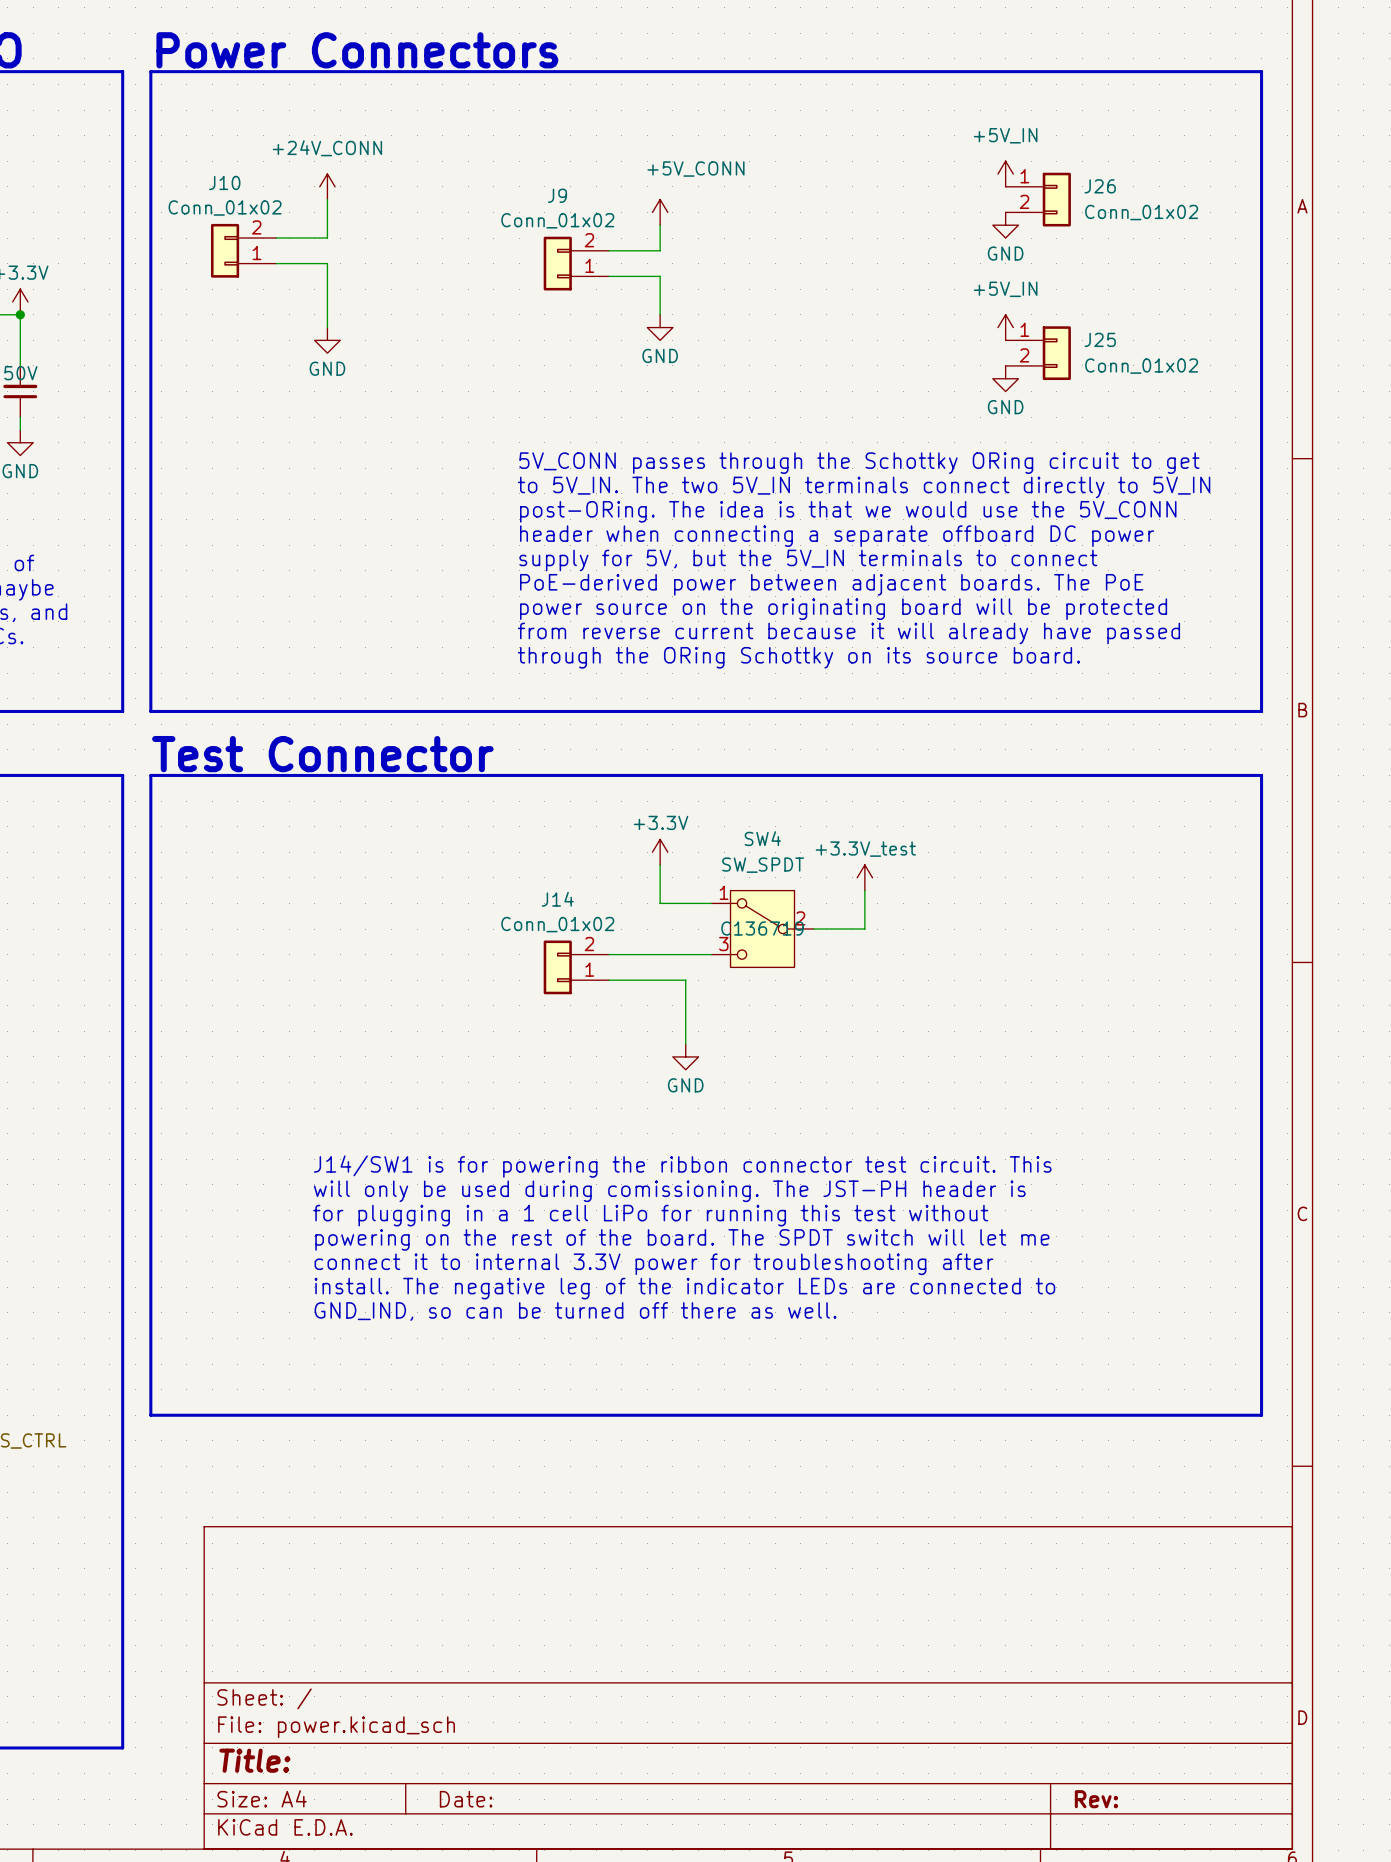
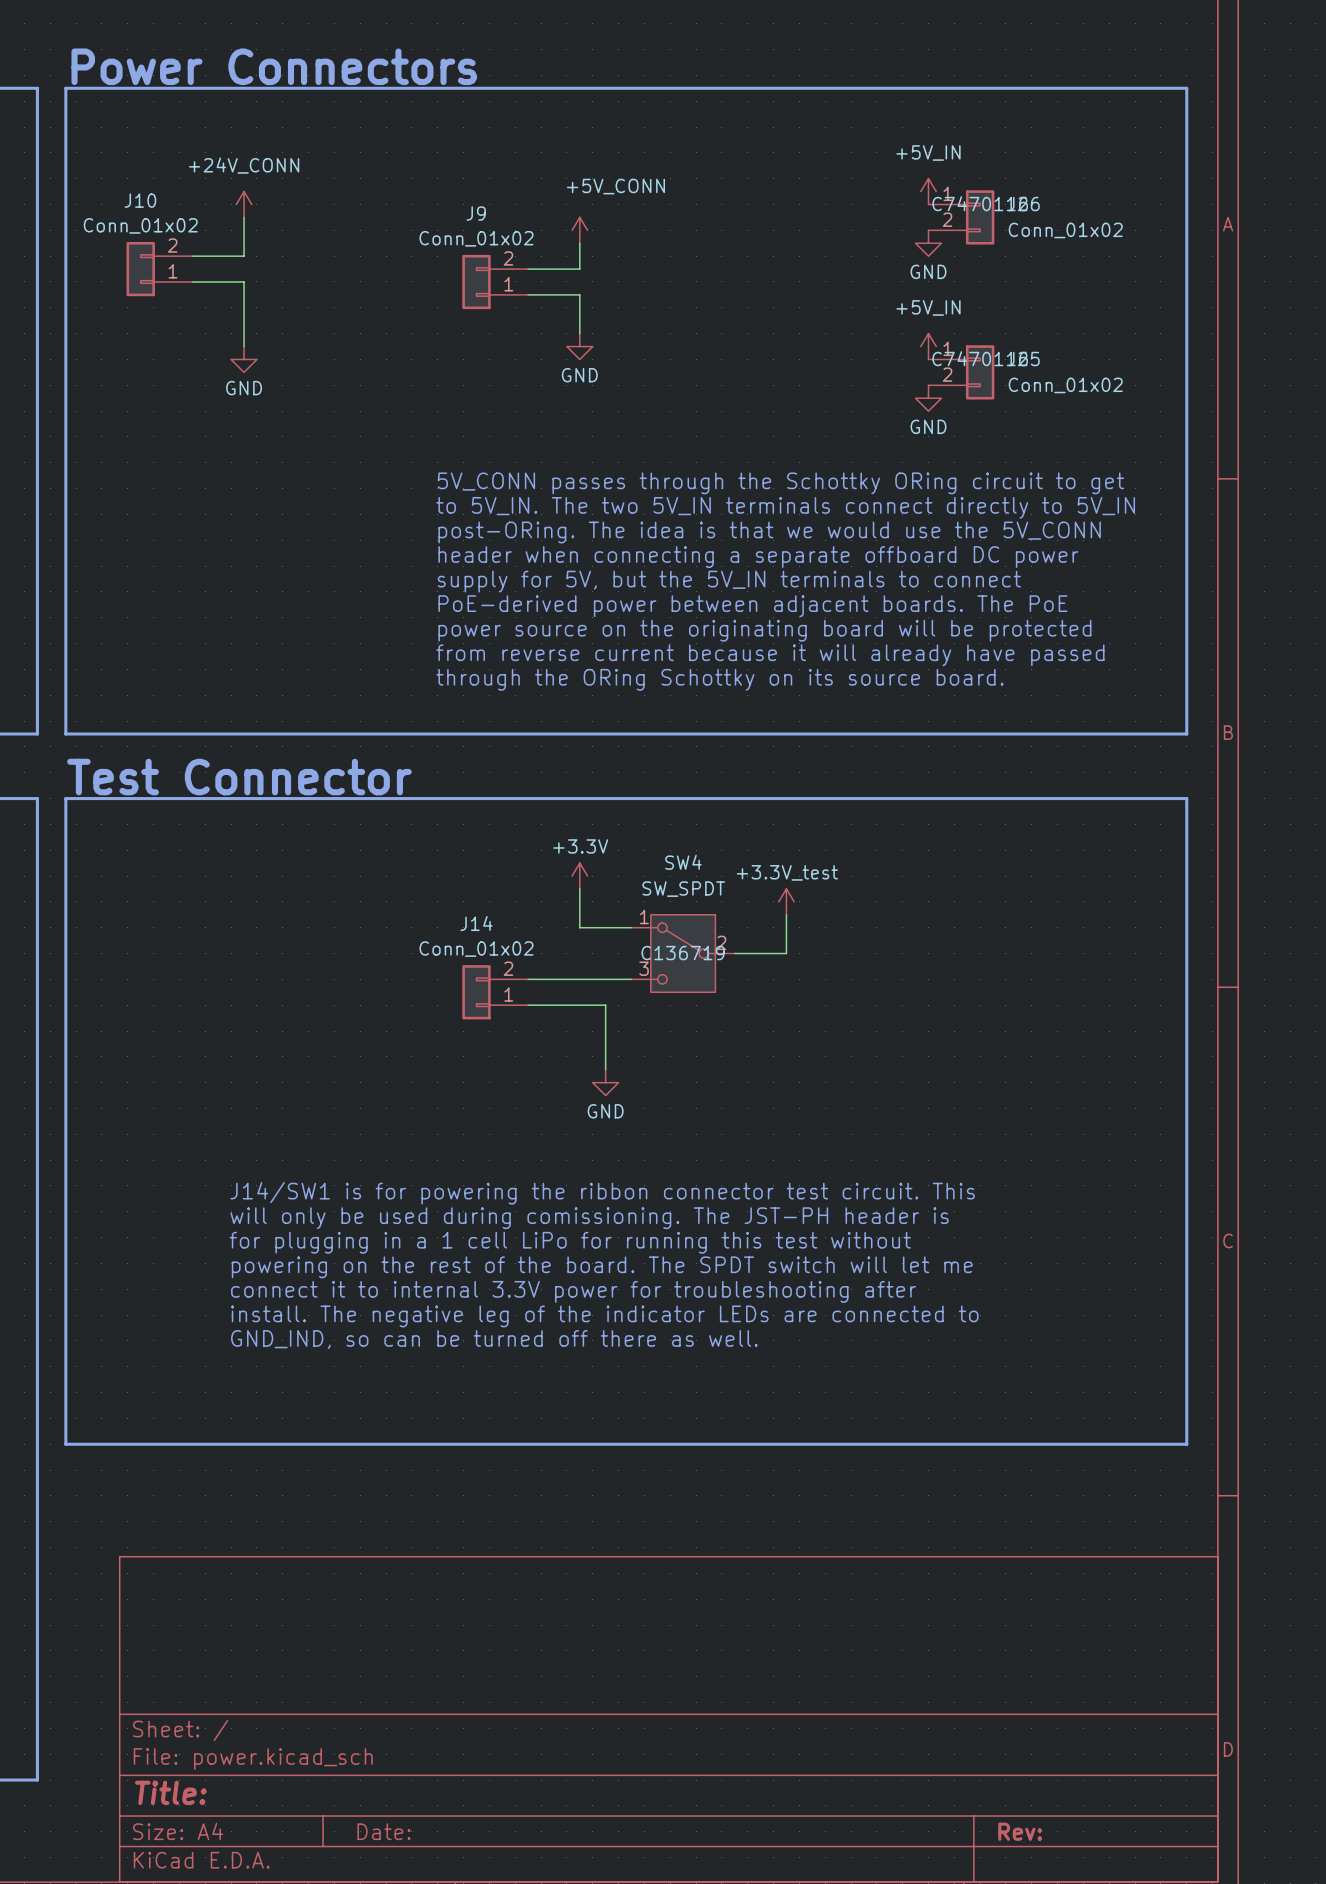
J26 text: none -> C7470116 (980, 203)
J25 text: none -> C7470116 (980, 358)

